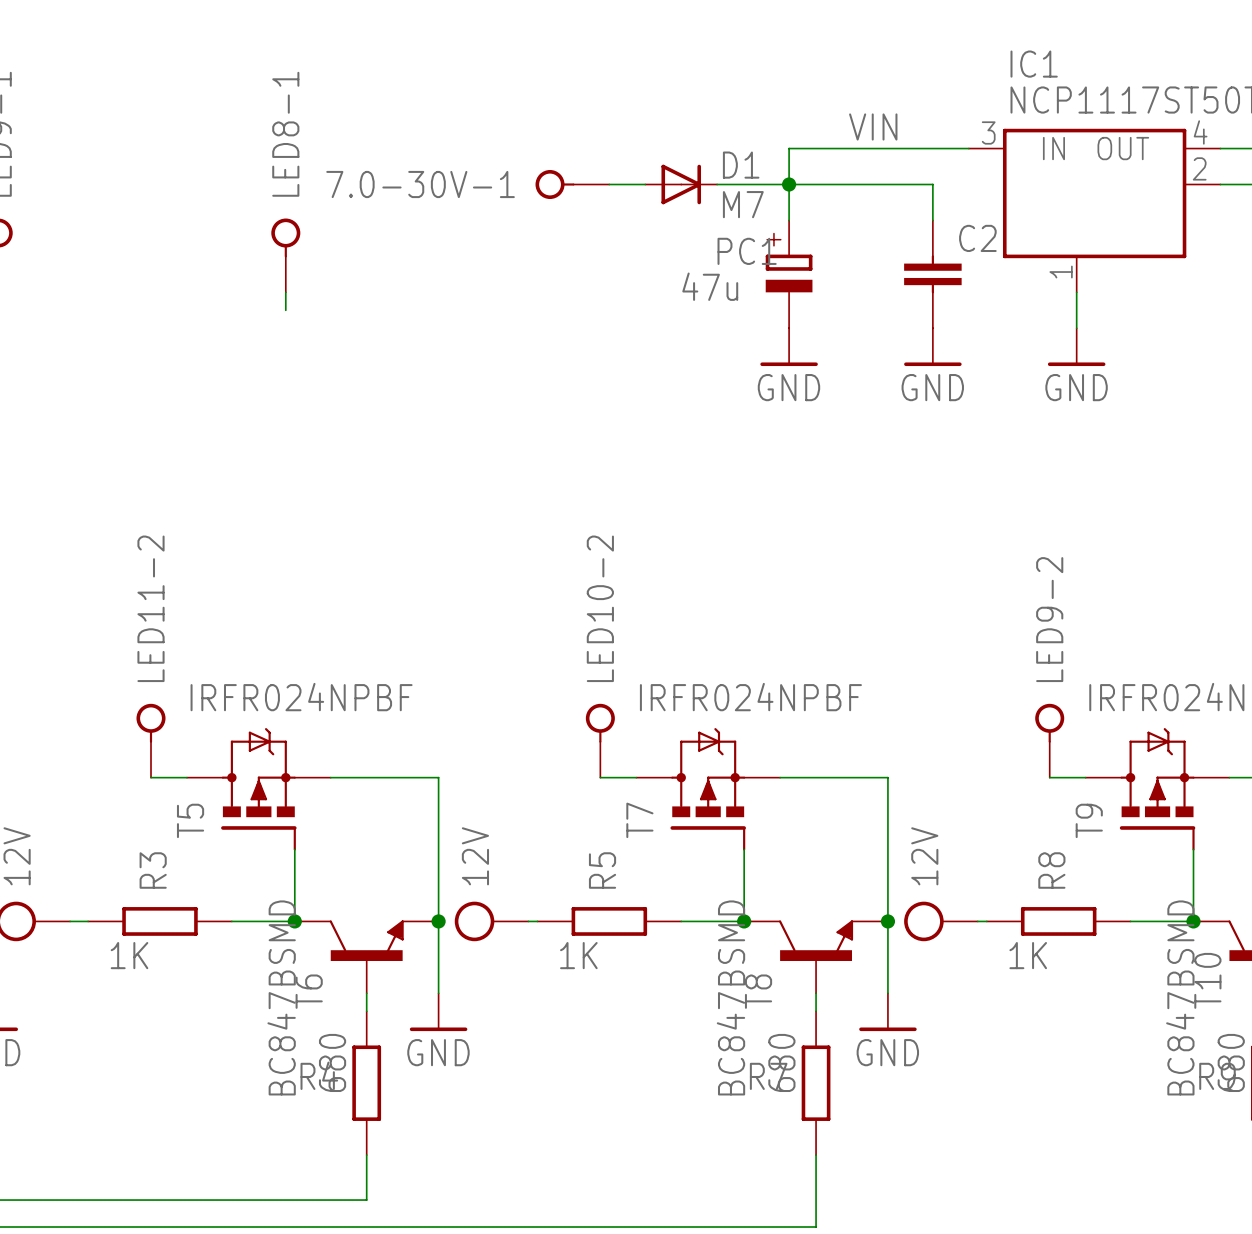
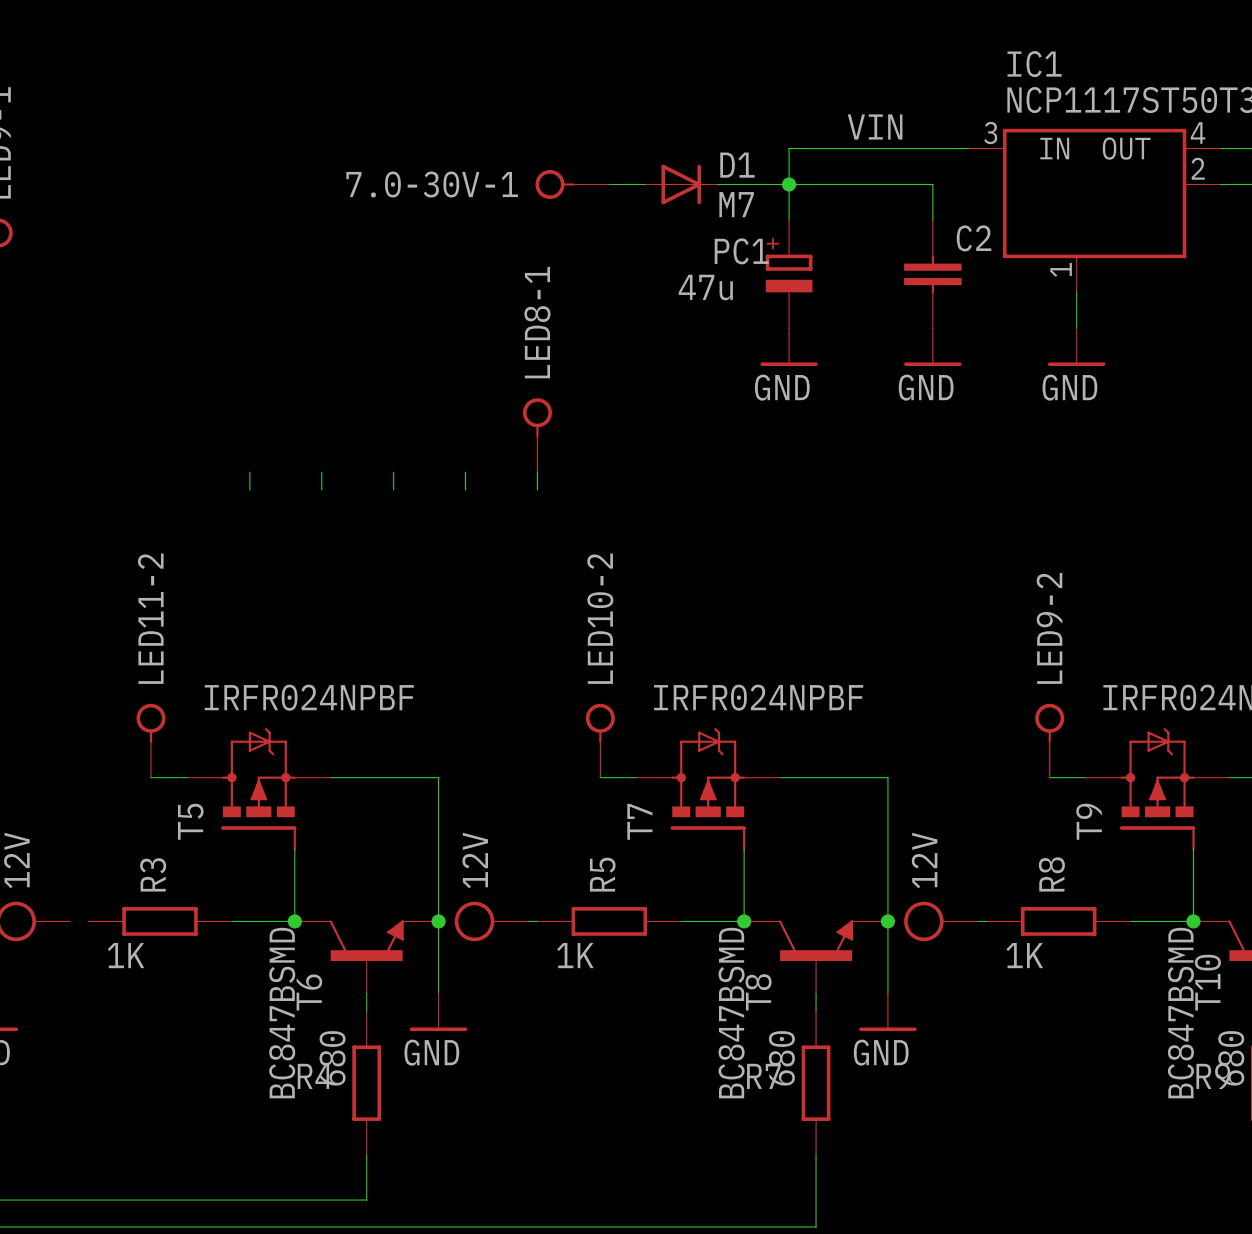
LED8-1 position: (285, 255) -> (537, 435)
wire: (285, 292) (285, 310) -> (321, 472) (321, 490)
wire: none -> (249, 472) (249, 490)
wire: none -> (393, 472) (393, 490)
wire: none -> (465, 472) (465, 490)
wire: none -> (537, 472) (537, 490)
wire: (70, 921) (88, 921) -> none

